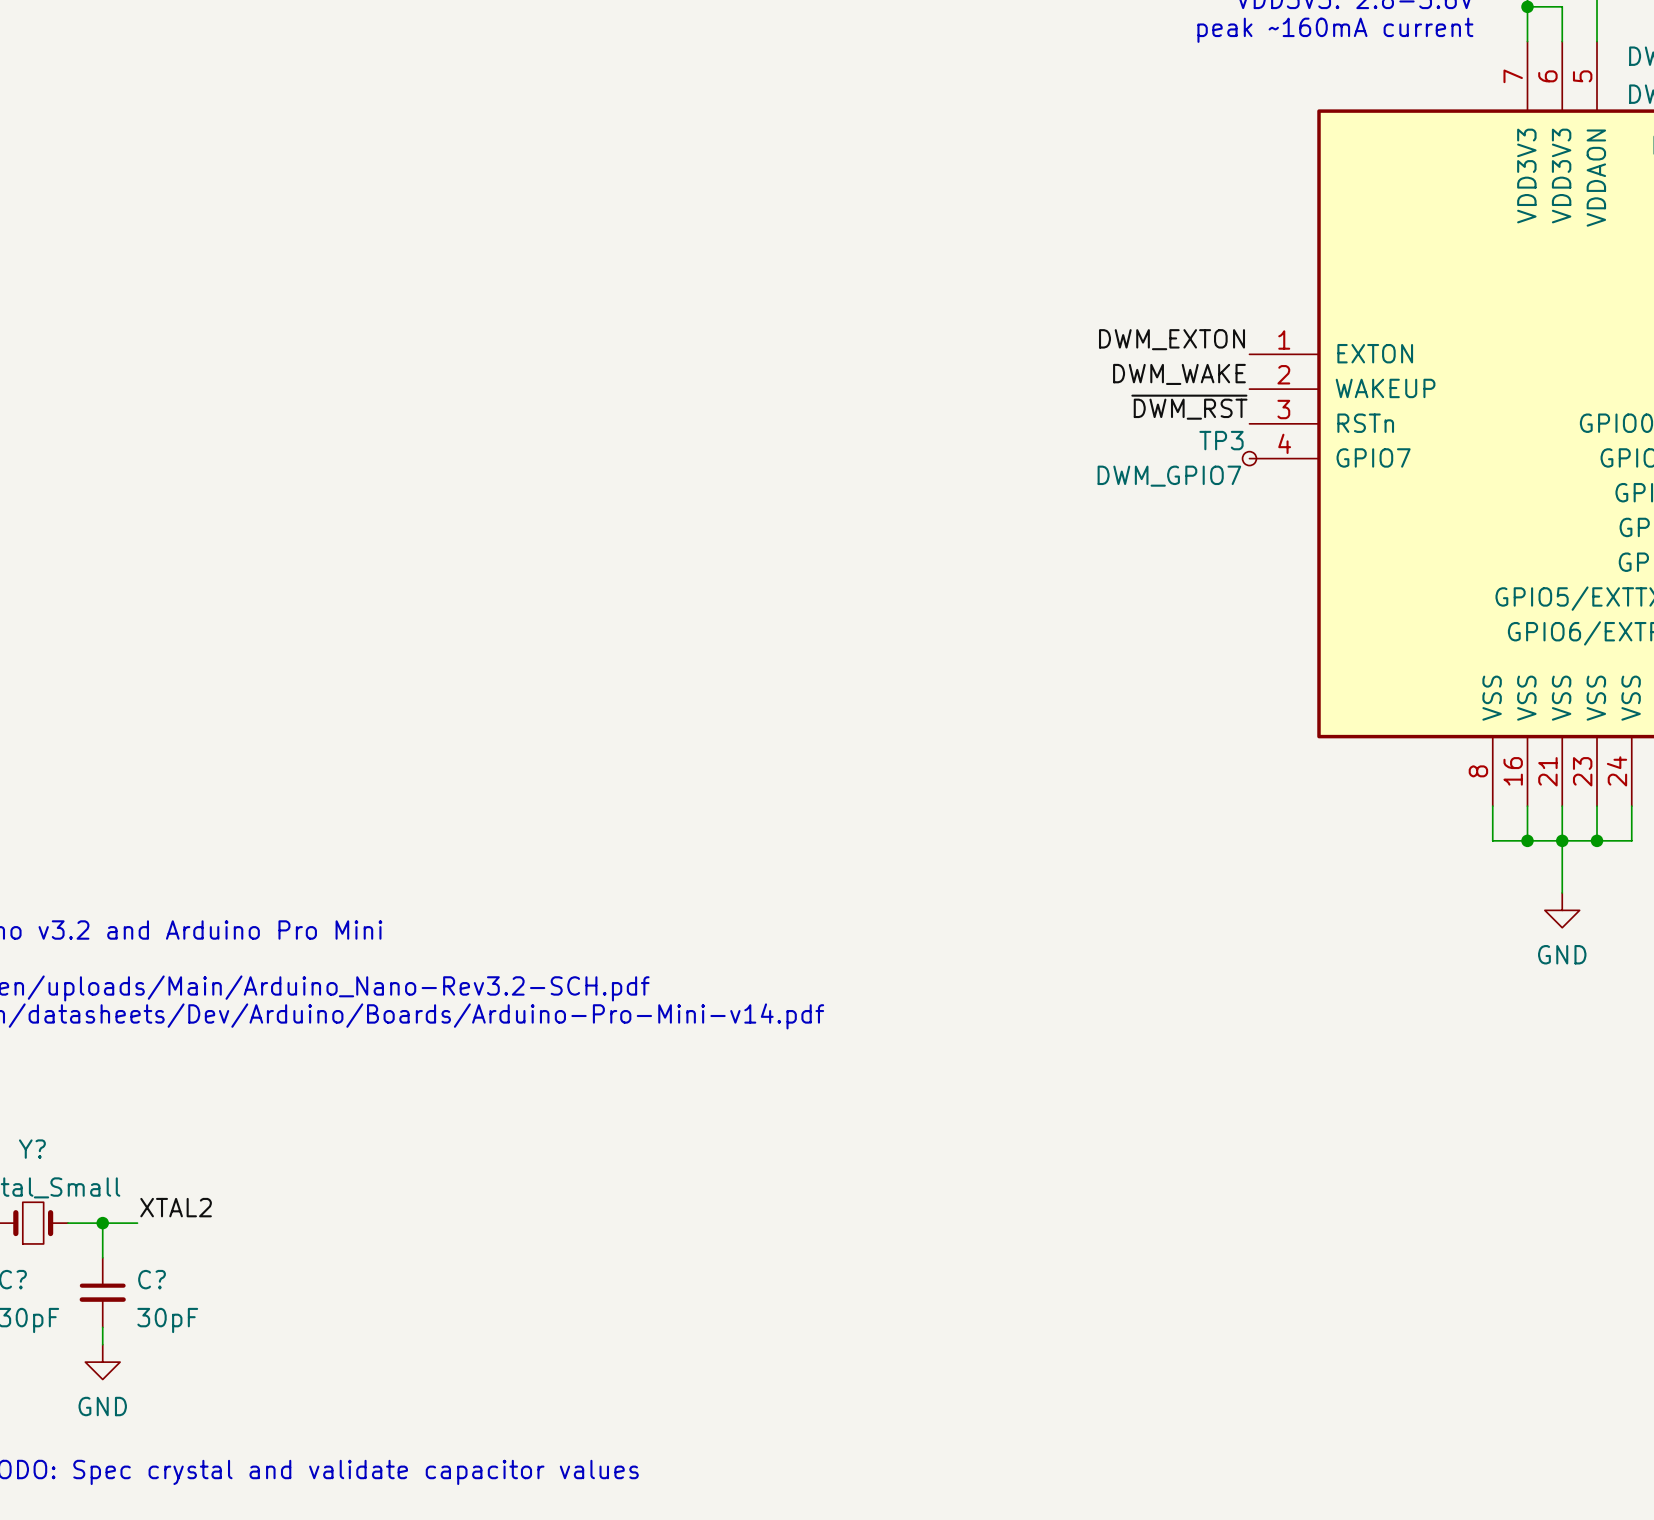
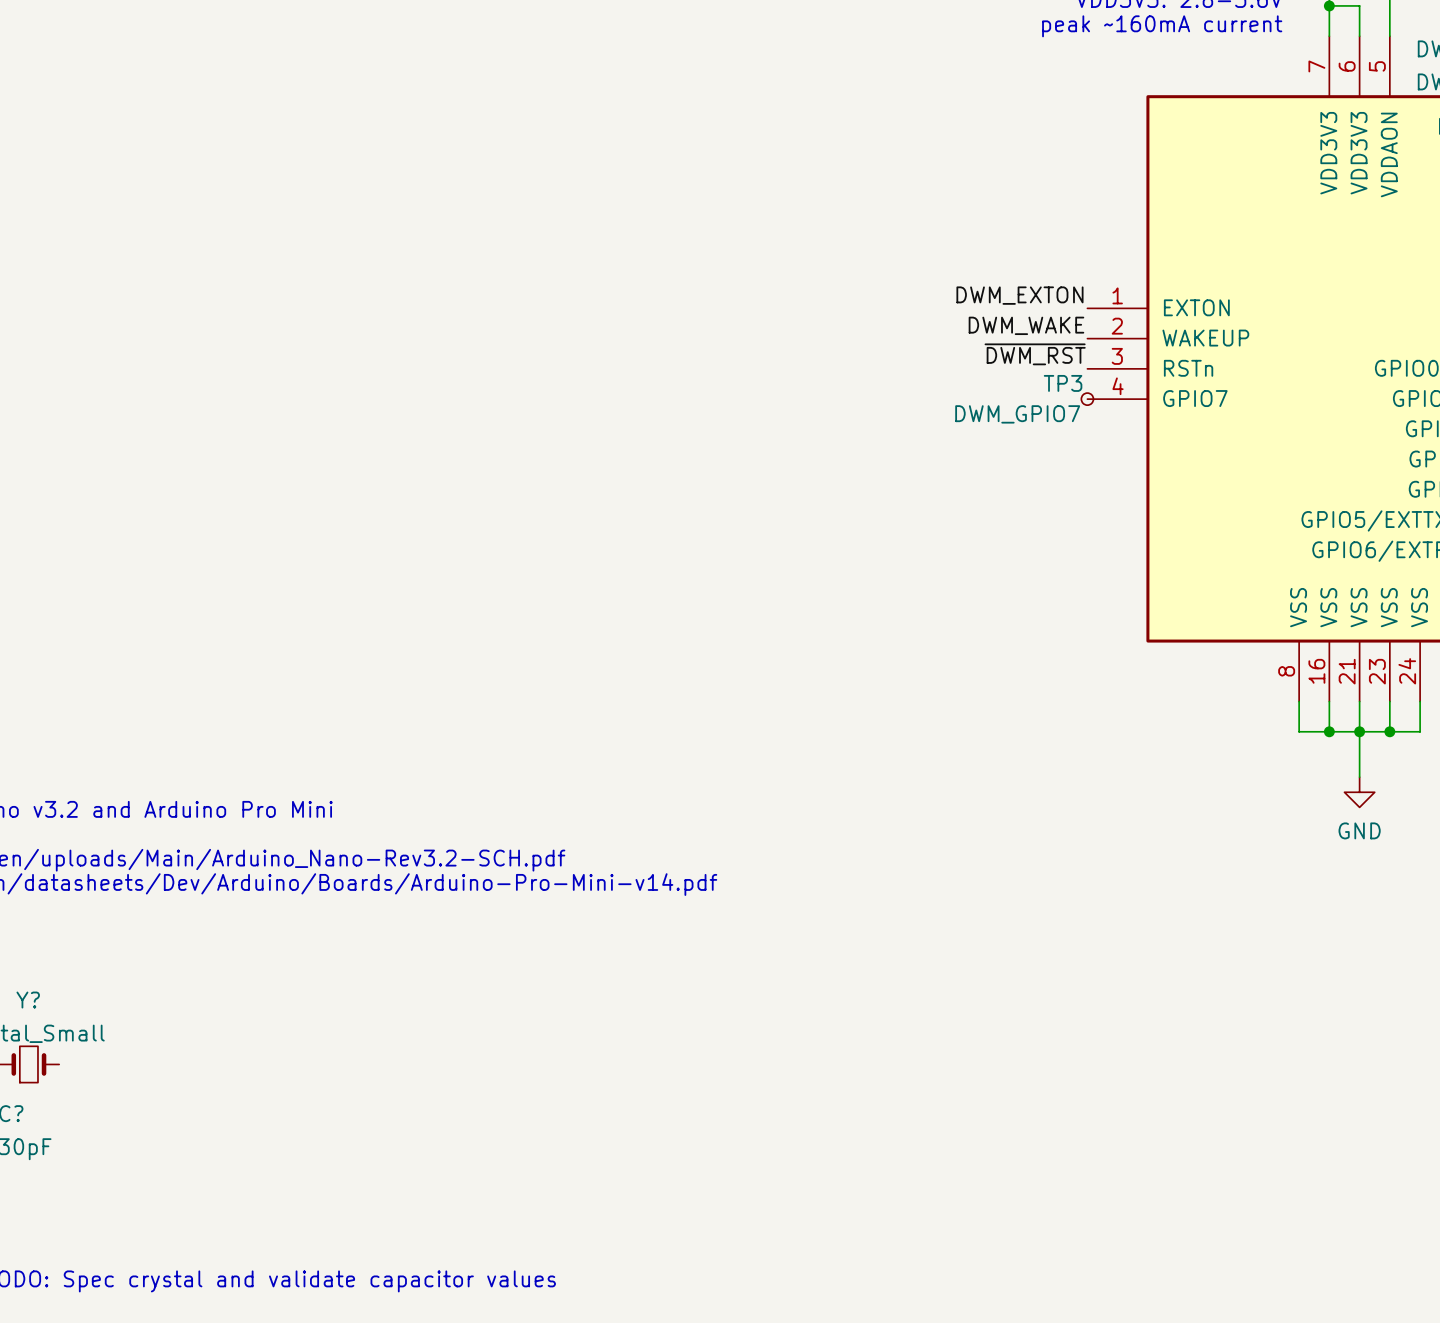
label: XTAL2 (176, 1207) -> none
wire: (67, 1223) (137, 1223) -> none
wire: (102, 1223) (102, 1257) -> none
junction: (102, 1223) -> none
C?: 30pF (102, 1292) -> none
wire: (102, 1327) (102, 1344) -> none
power symbol: GND (102, 1362) -> none

